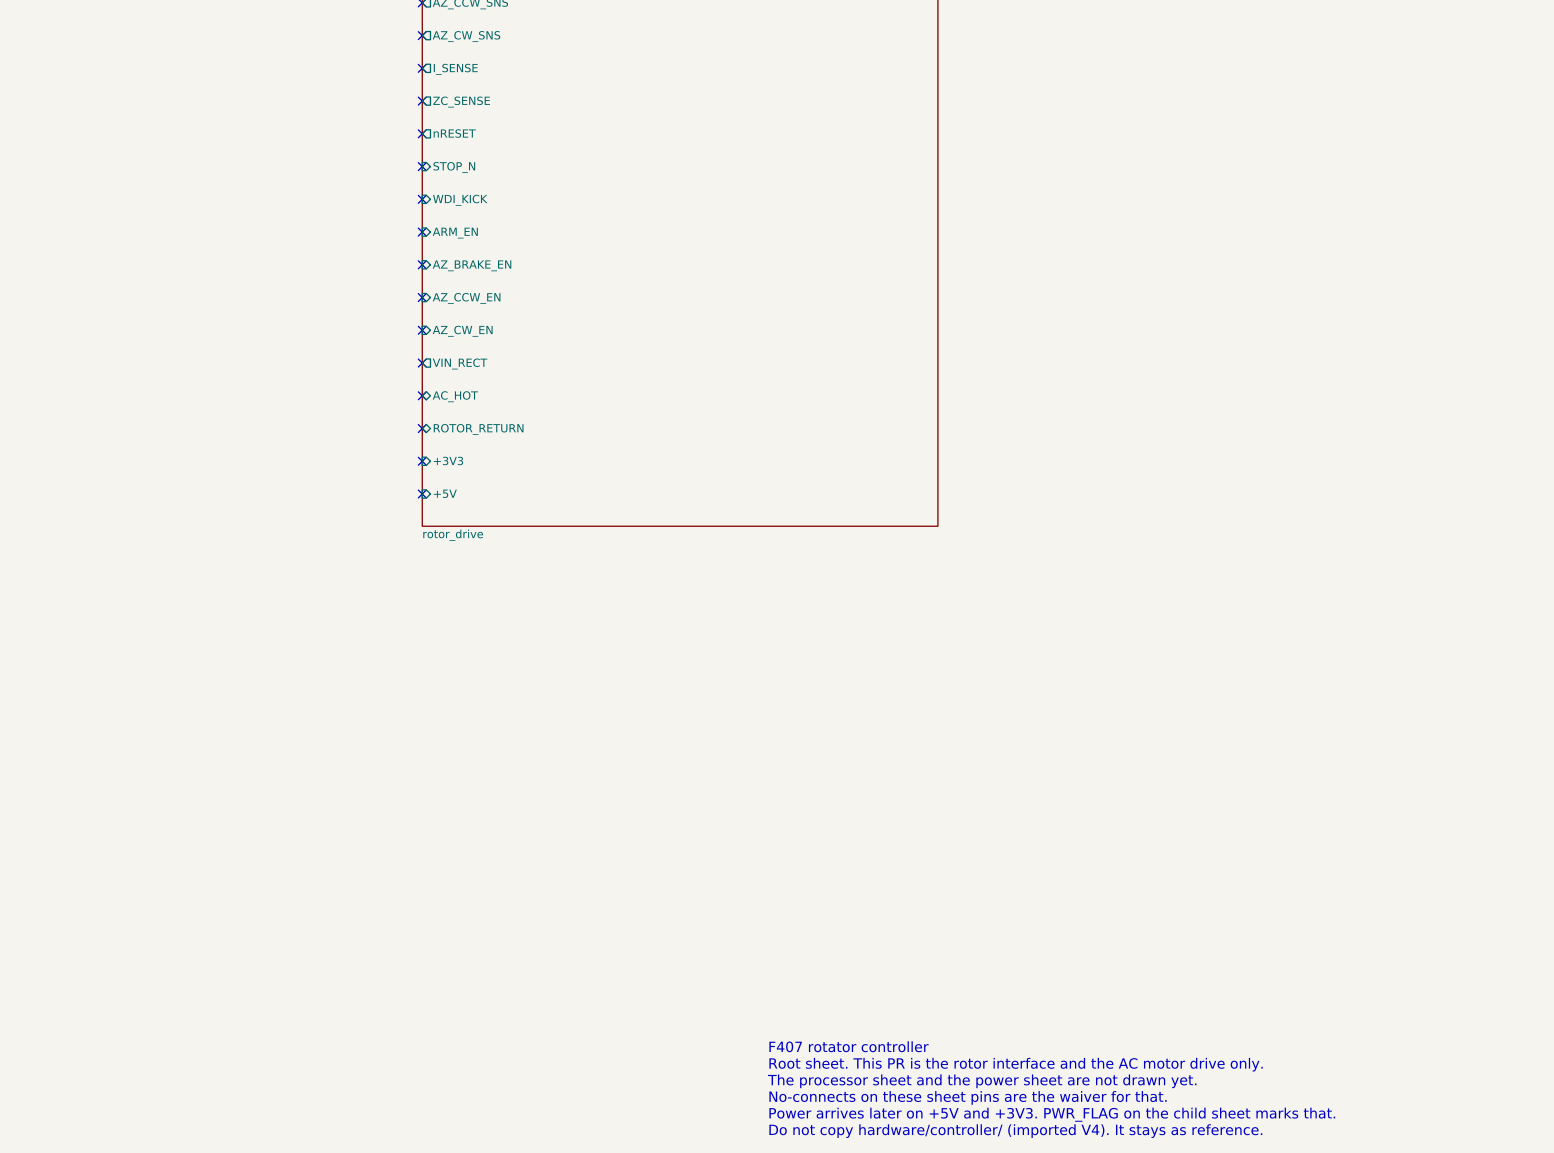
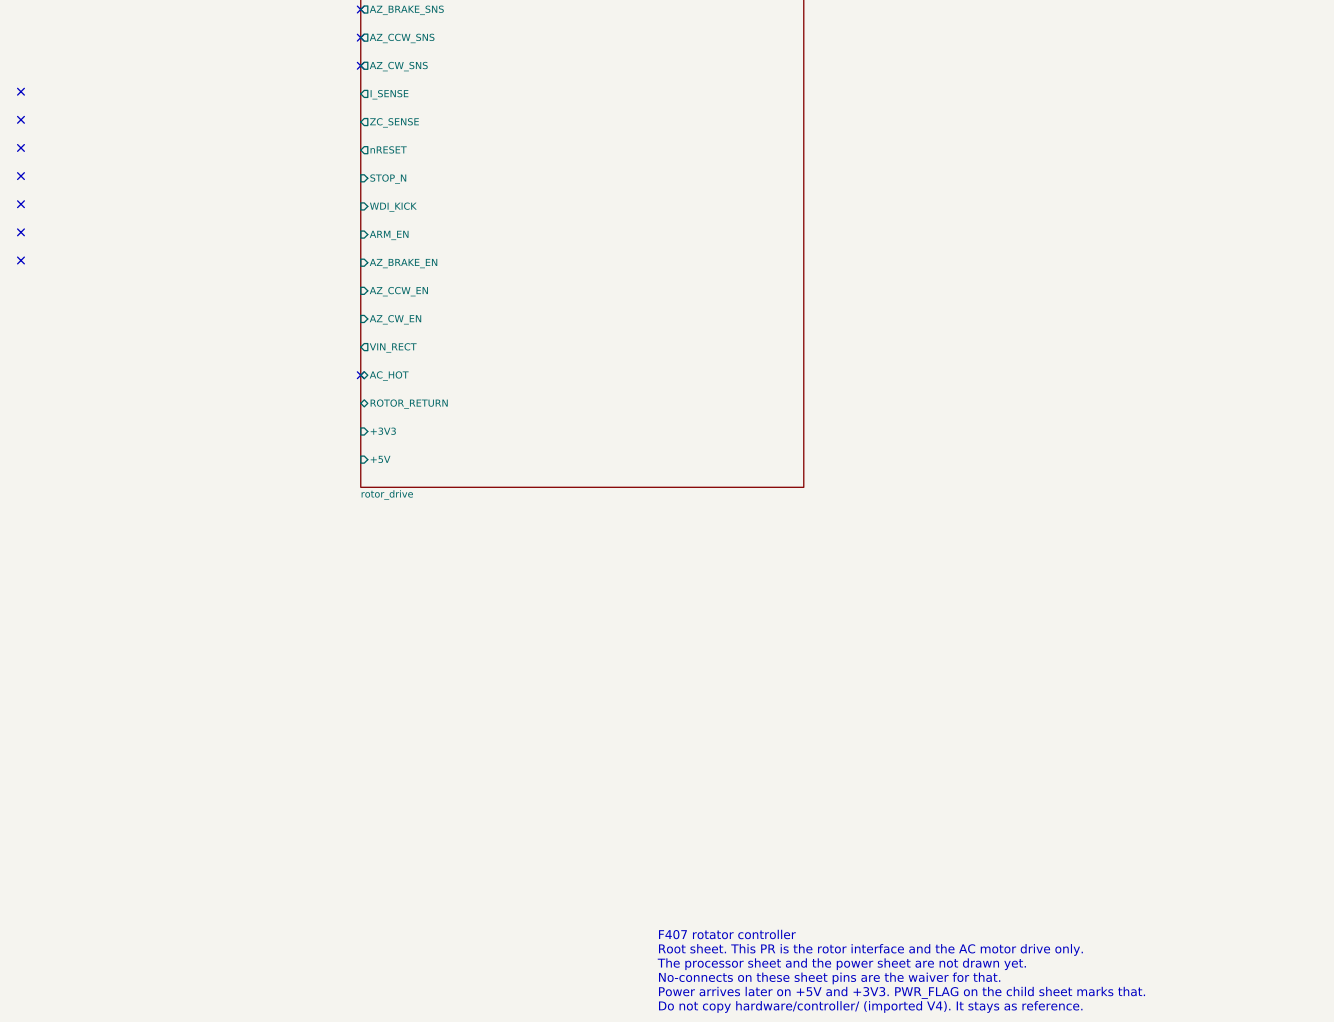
no-connect mark: none -> (20, 91)
no-connect mark: (422, 68) -> none
no-connect mark: none -> (20, 119)
no-connect mark: (422, 101) -> none
no-connect mark: none -> (20, 147)
no-connect mark: (422, 133) -> none
no-connect mark: none -> (20, 176)
no-connect mark: (422, 166) -> none
no-connect mark: none -> (20, 204)
no-connect mark: (422, 199) -> none
no-connect mark: none -> (20, 232)
no-connect mark: (422, 232) -> none
no-connect mark: none -> (20, 260)
no-connect mark: (422, 264) -> none
no-connect mark: (422, 297) -> none
no-connect mark: (422, 330) -> none
no-connect mark: (422, 363) -> none
no-connect mark: (422, 428) -> none
no-connect mark: (422, 461) -> none
no-connect mark: (422, 494) -> none

